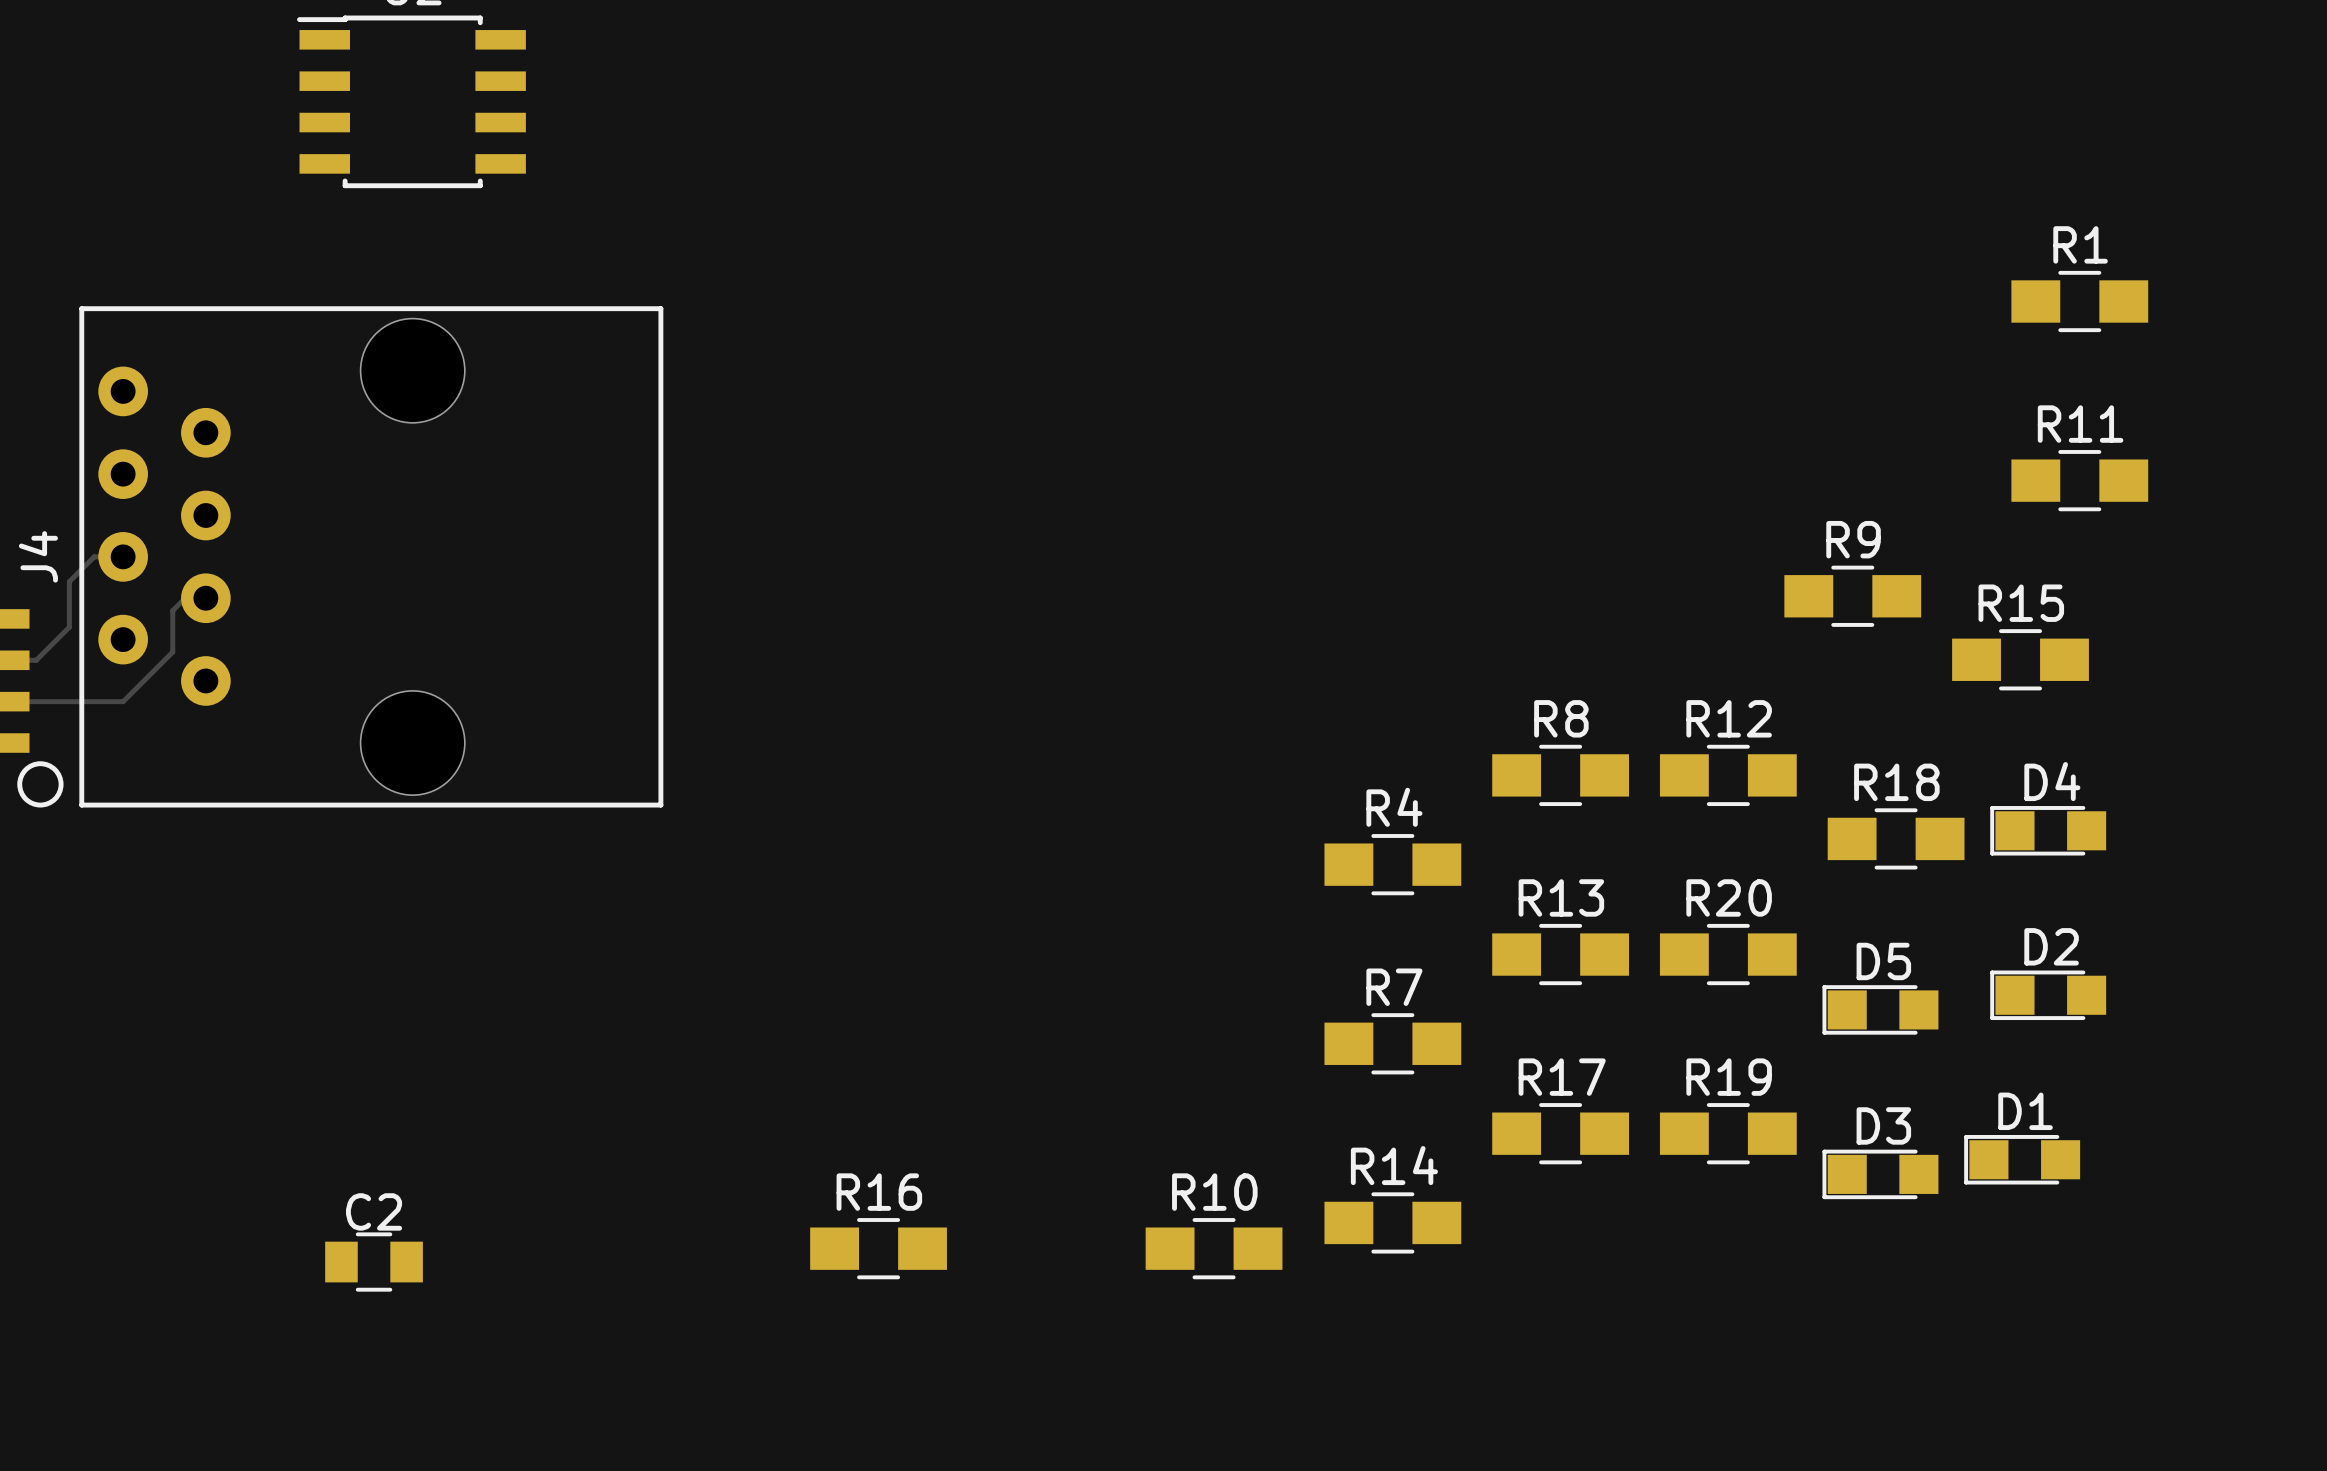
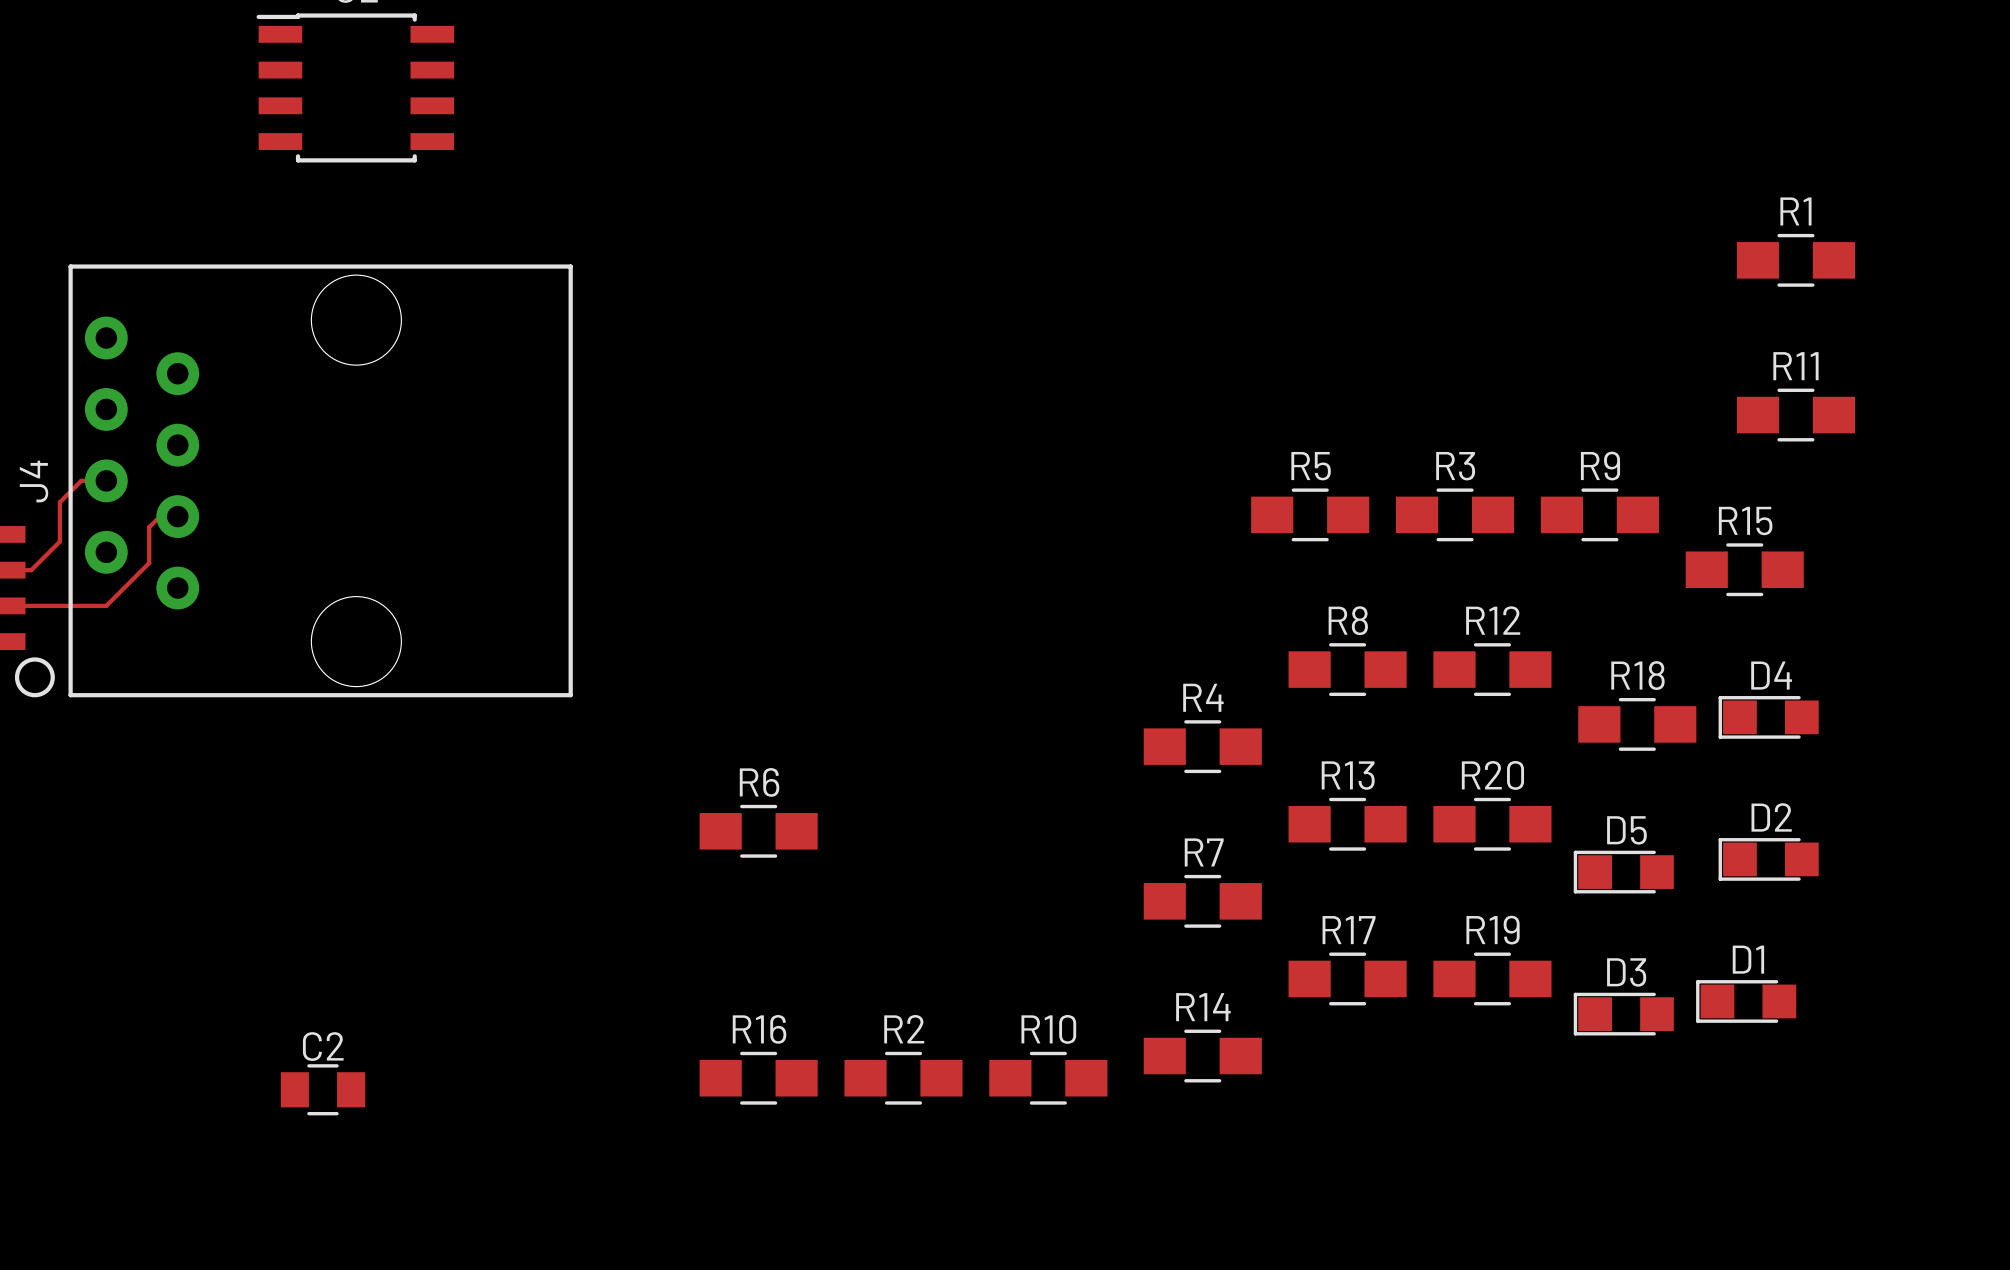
R5: none -> (1310, 514)
R3: none -> (1455, 514)
R6: none -> (758, 831)
R2: none -> (903, 1078)

